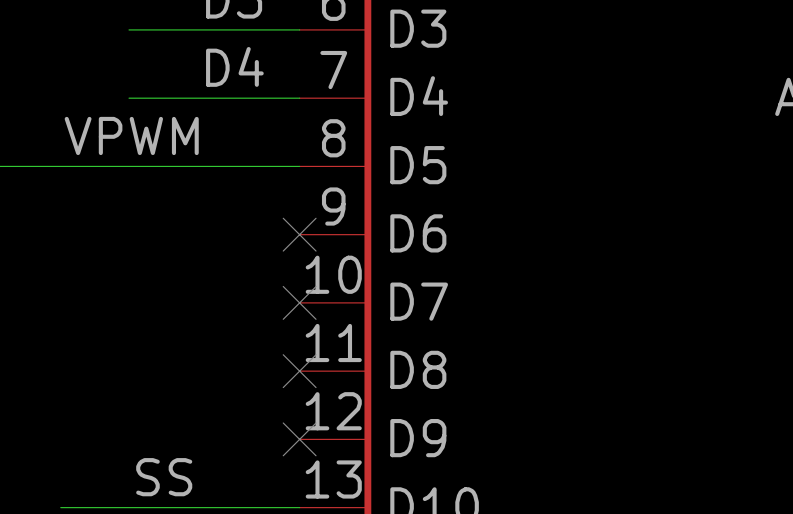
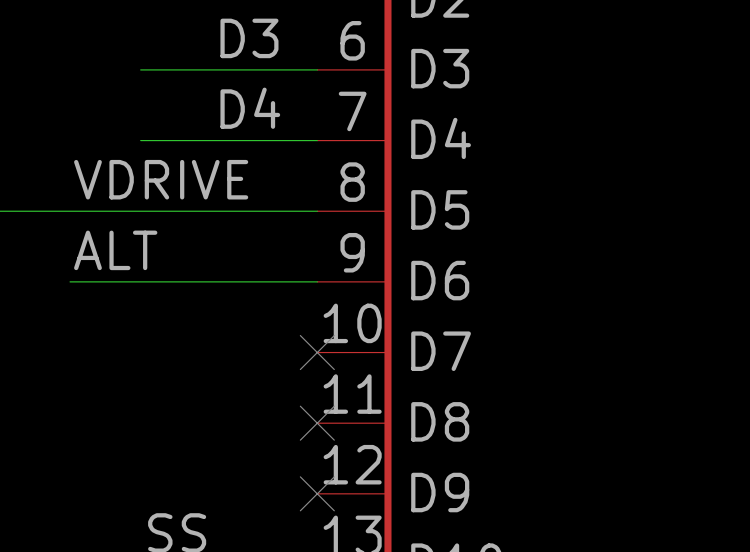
label: VPWM (131, 135) -> VDRIVE (161, 179)
label: none -> ALT (115, 250)
wire: none -> (70, 281) (317, 281)
no-connect mark: (299, 234) -> none

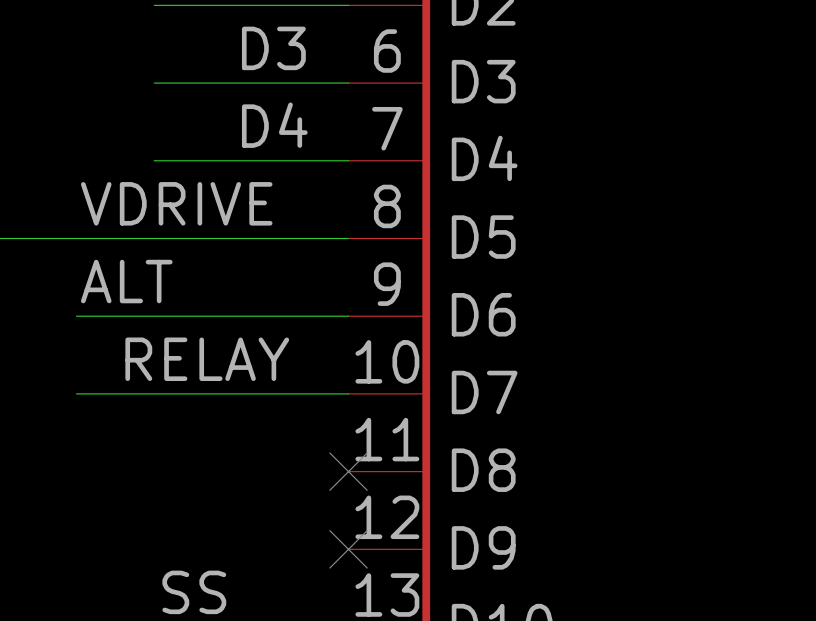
label: none -> RELAY (207, 359)
wire: none -> (76, 393) (348, 393)
no-connect mark: (317, 352) -> none

